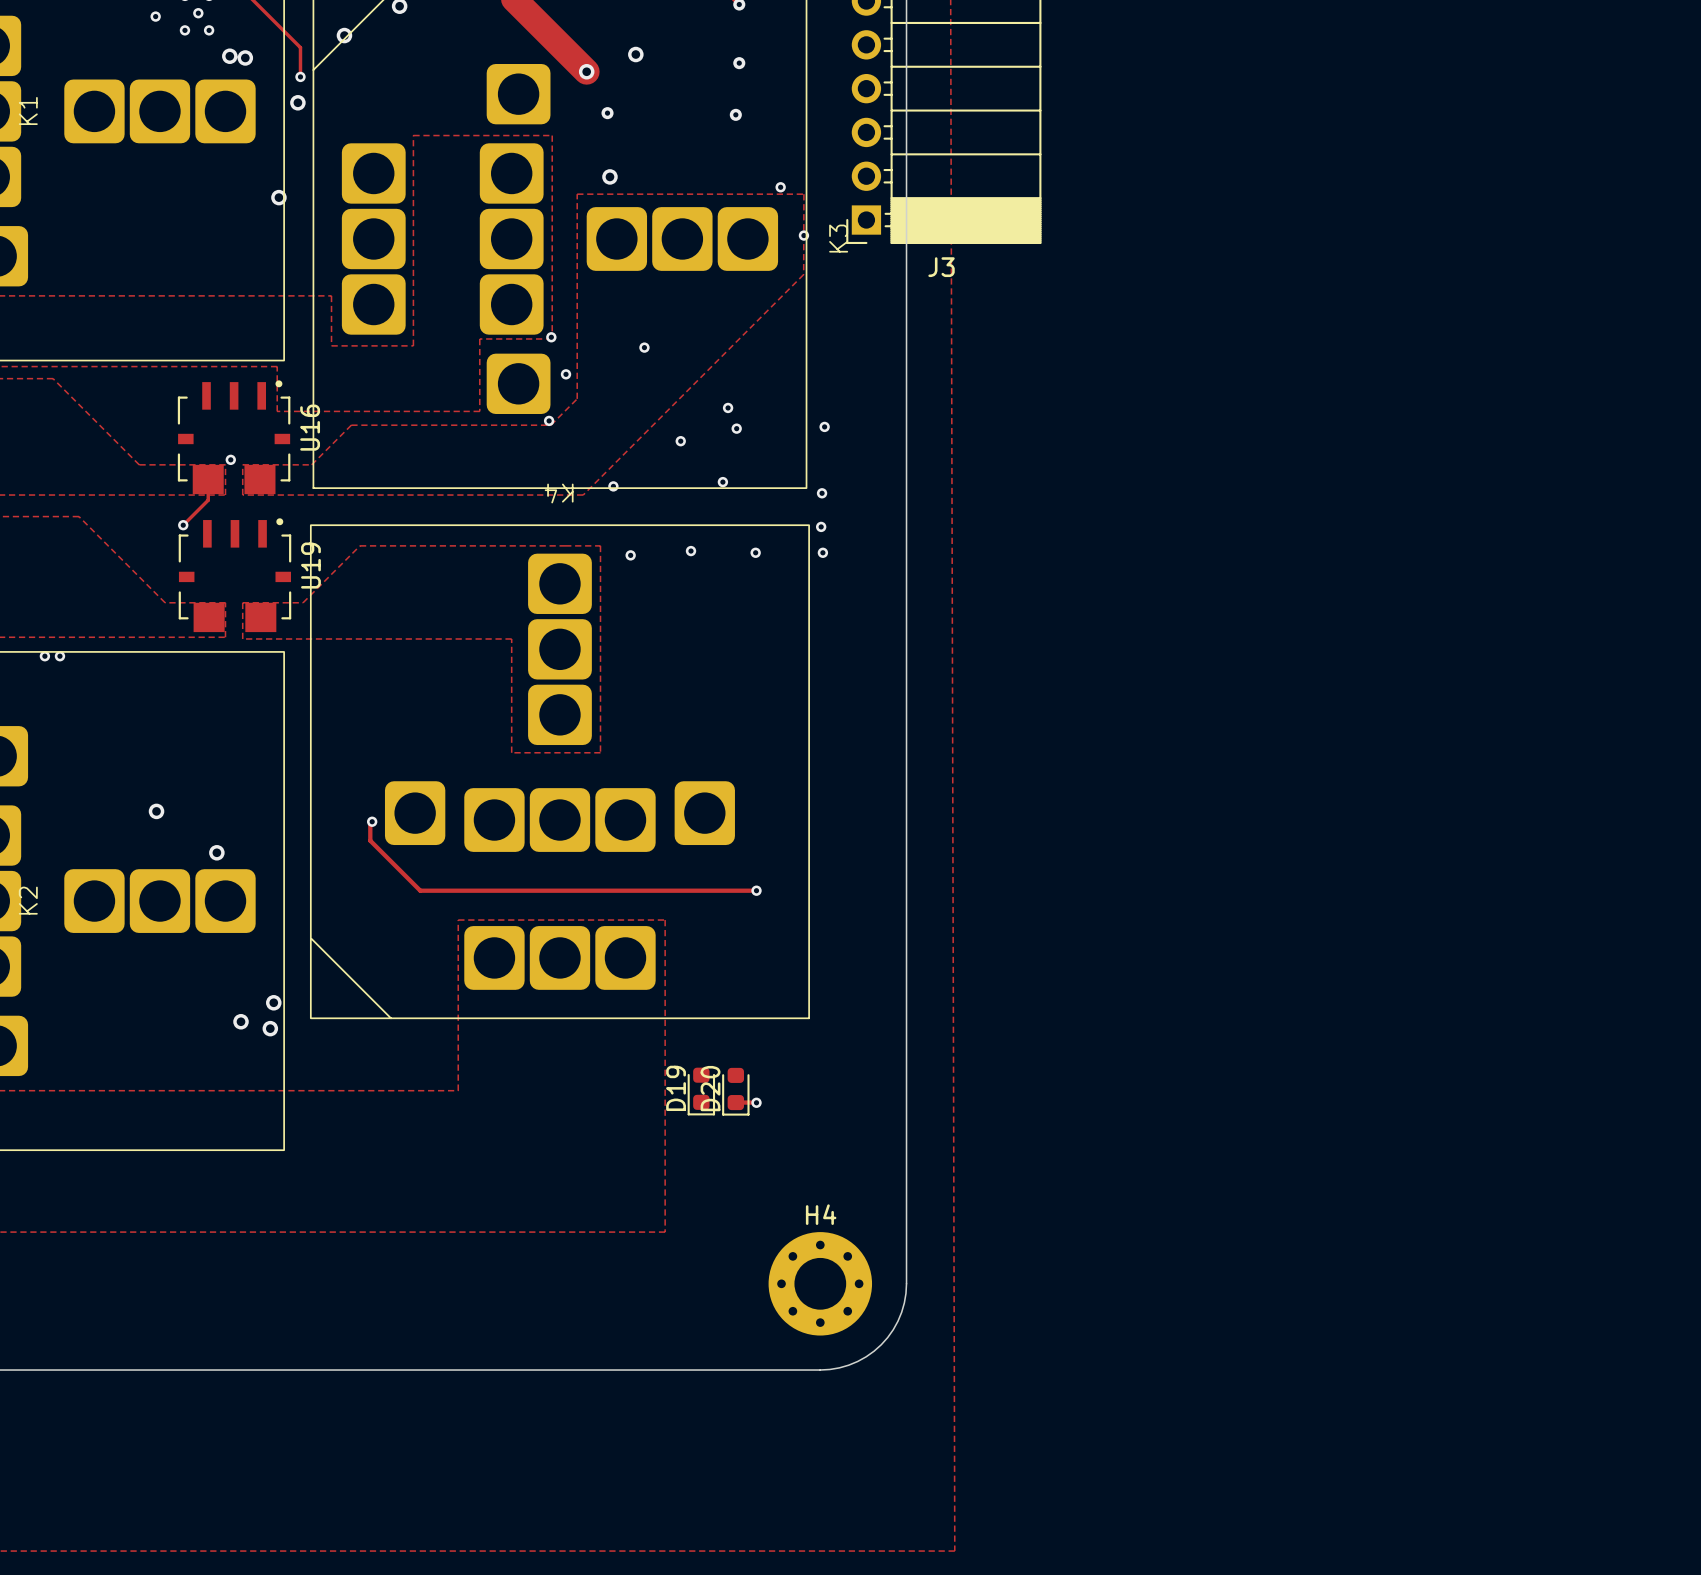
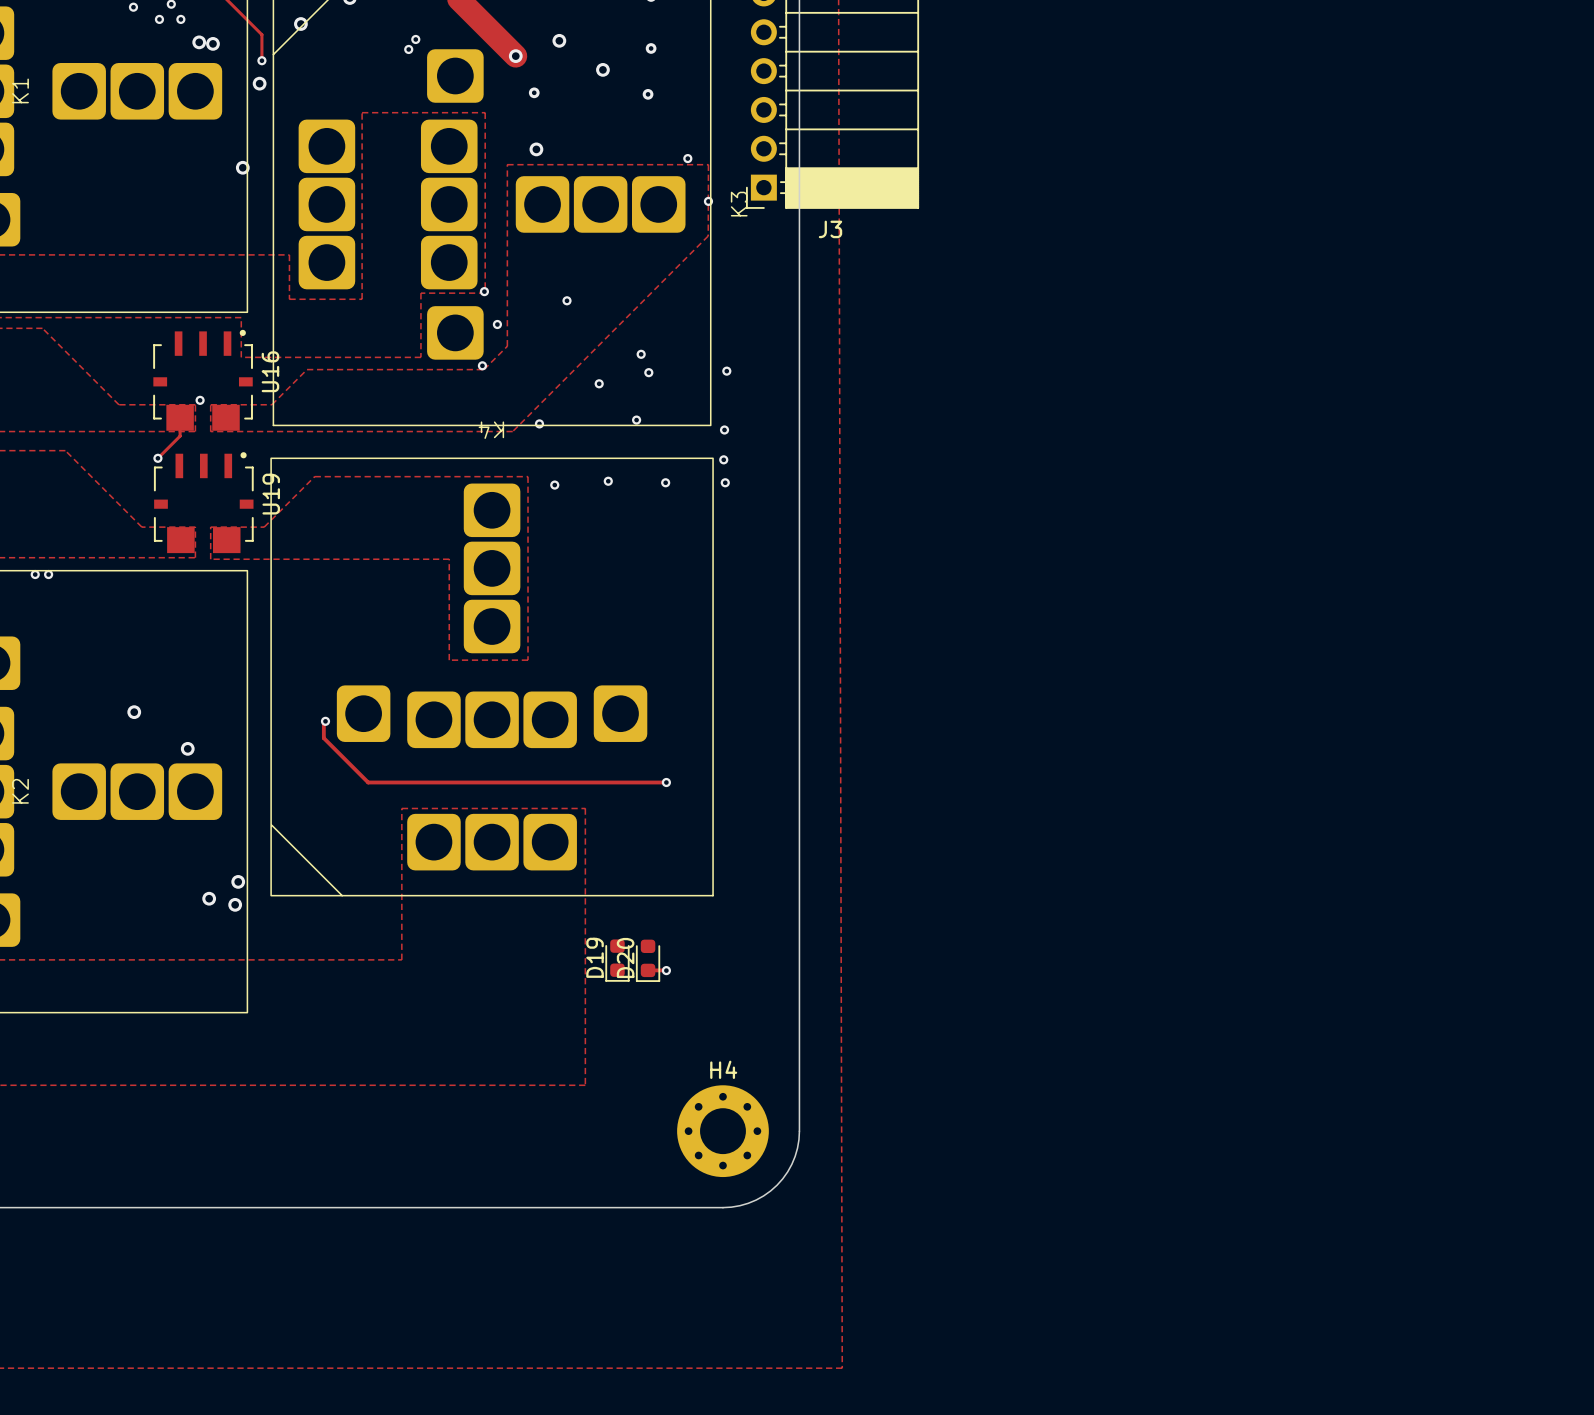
via: none -> (415, 39)
via: none -> (408, 49)
via: none -> (602, 69)

